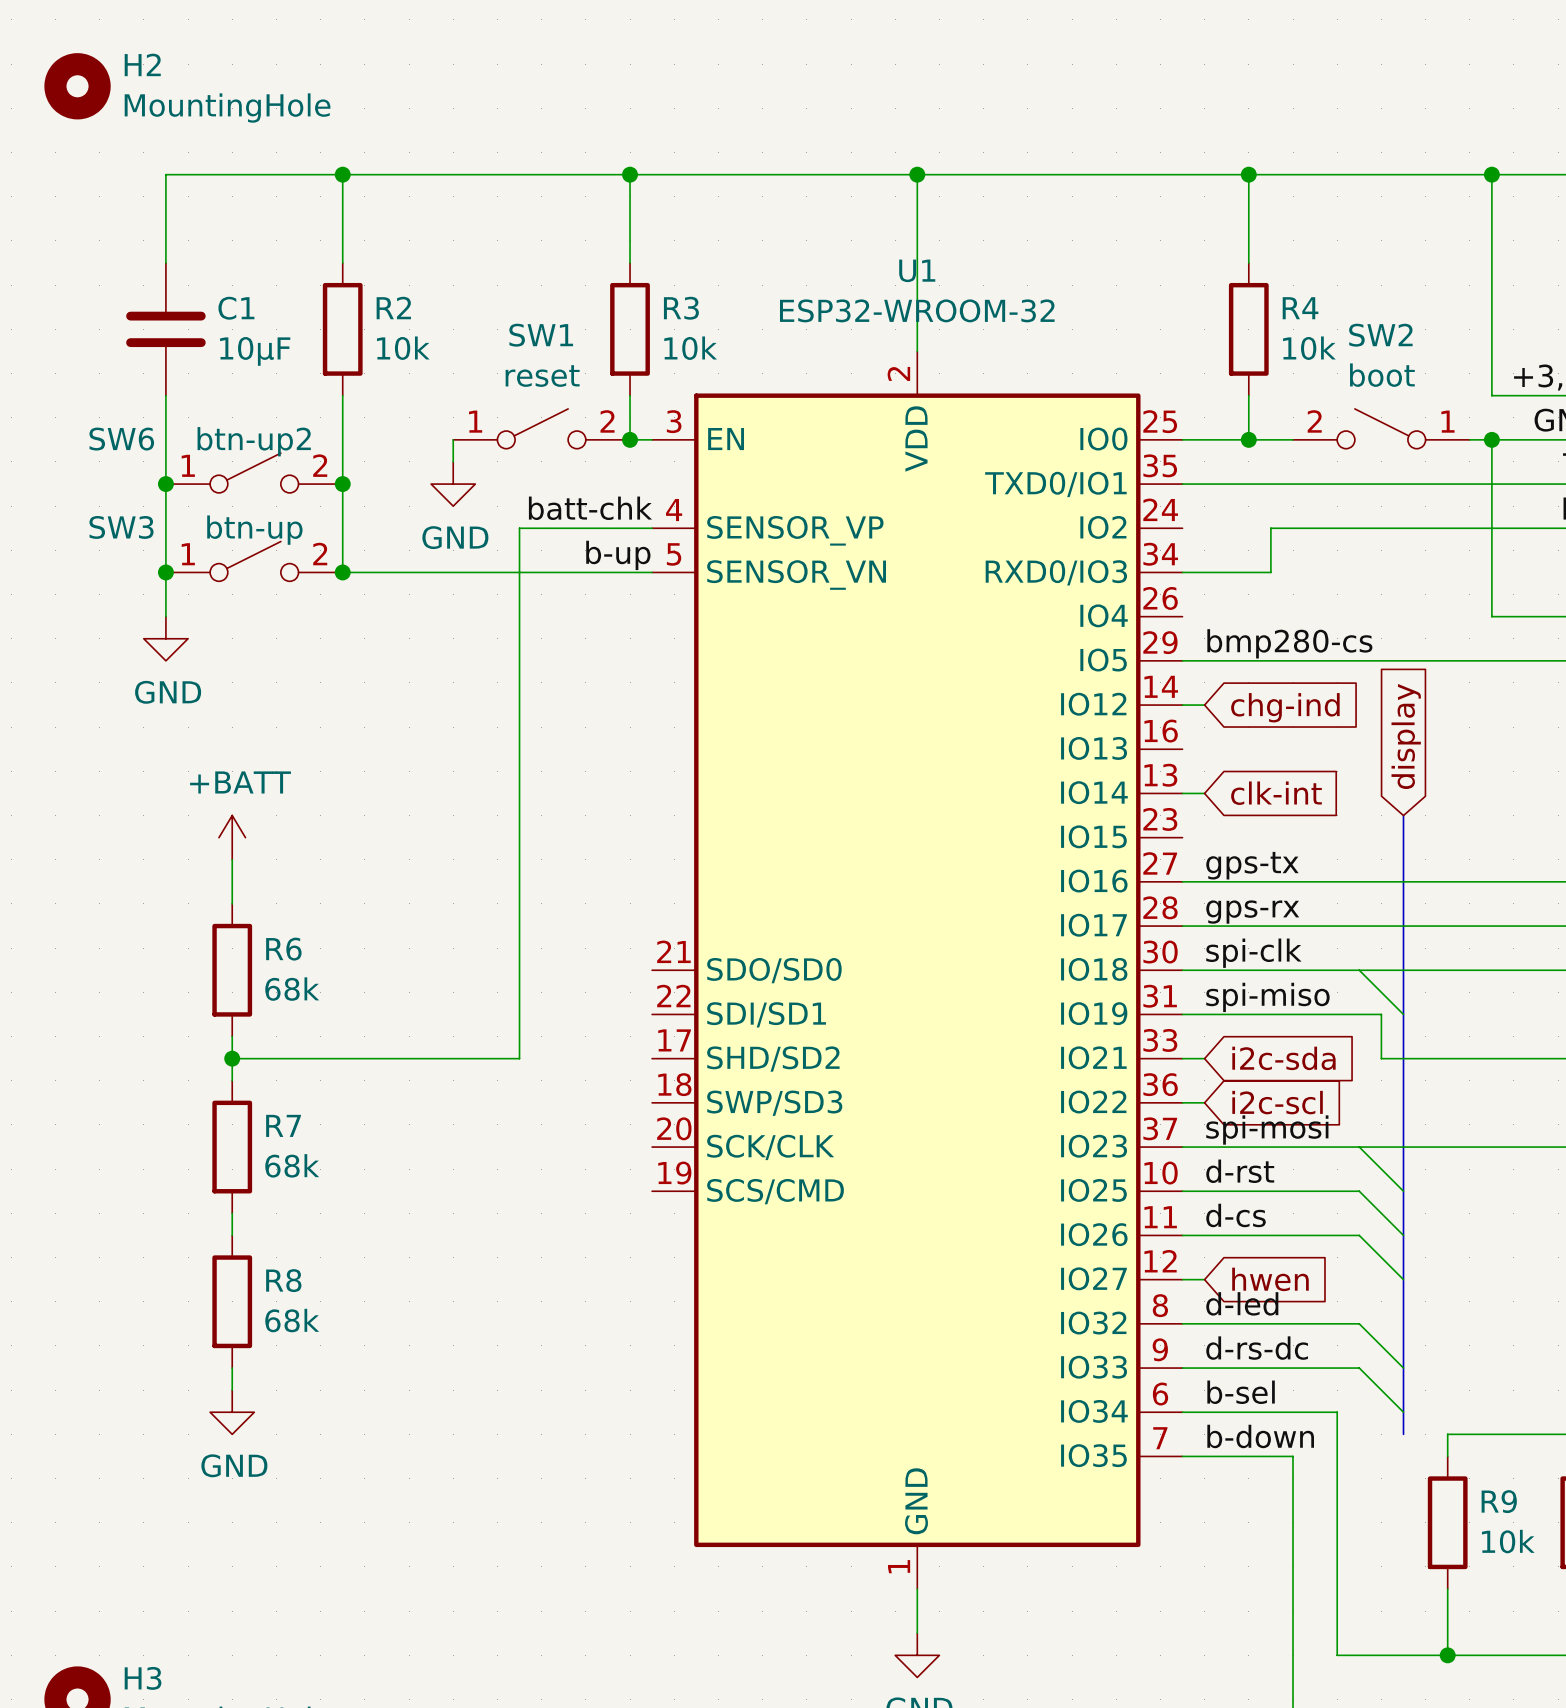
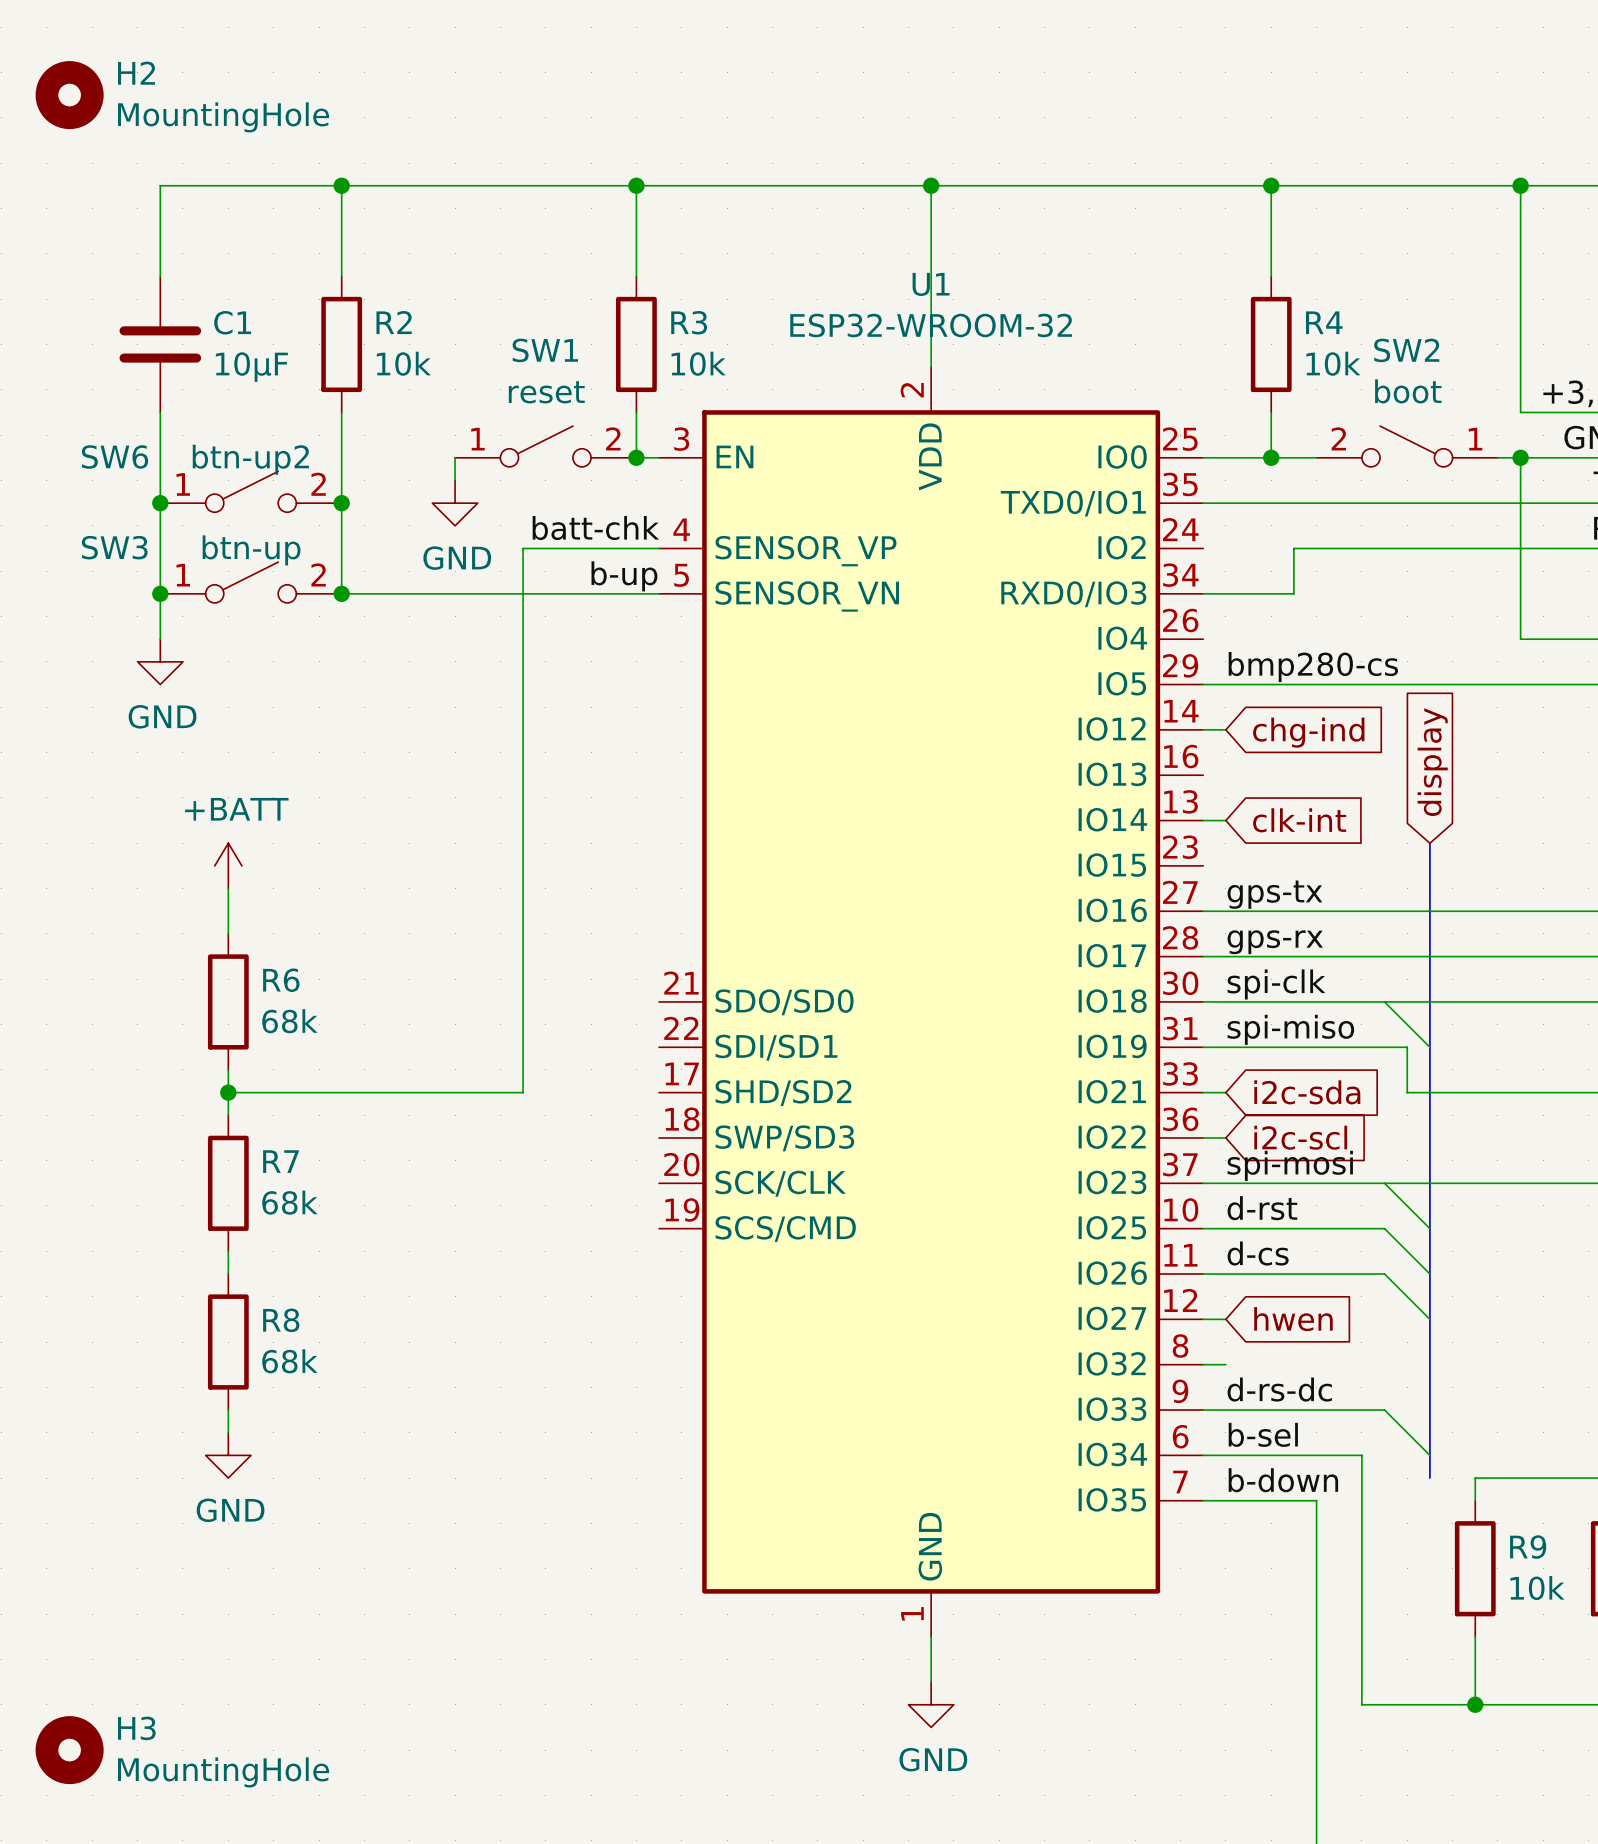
label: d-led (1242, 1303) -> none
wire: (1204, 1323) (1359, 1323) (1403, 1368) -> none

